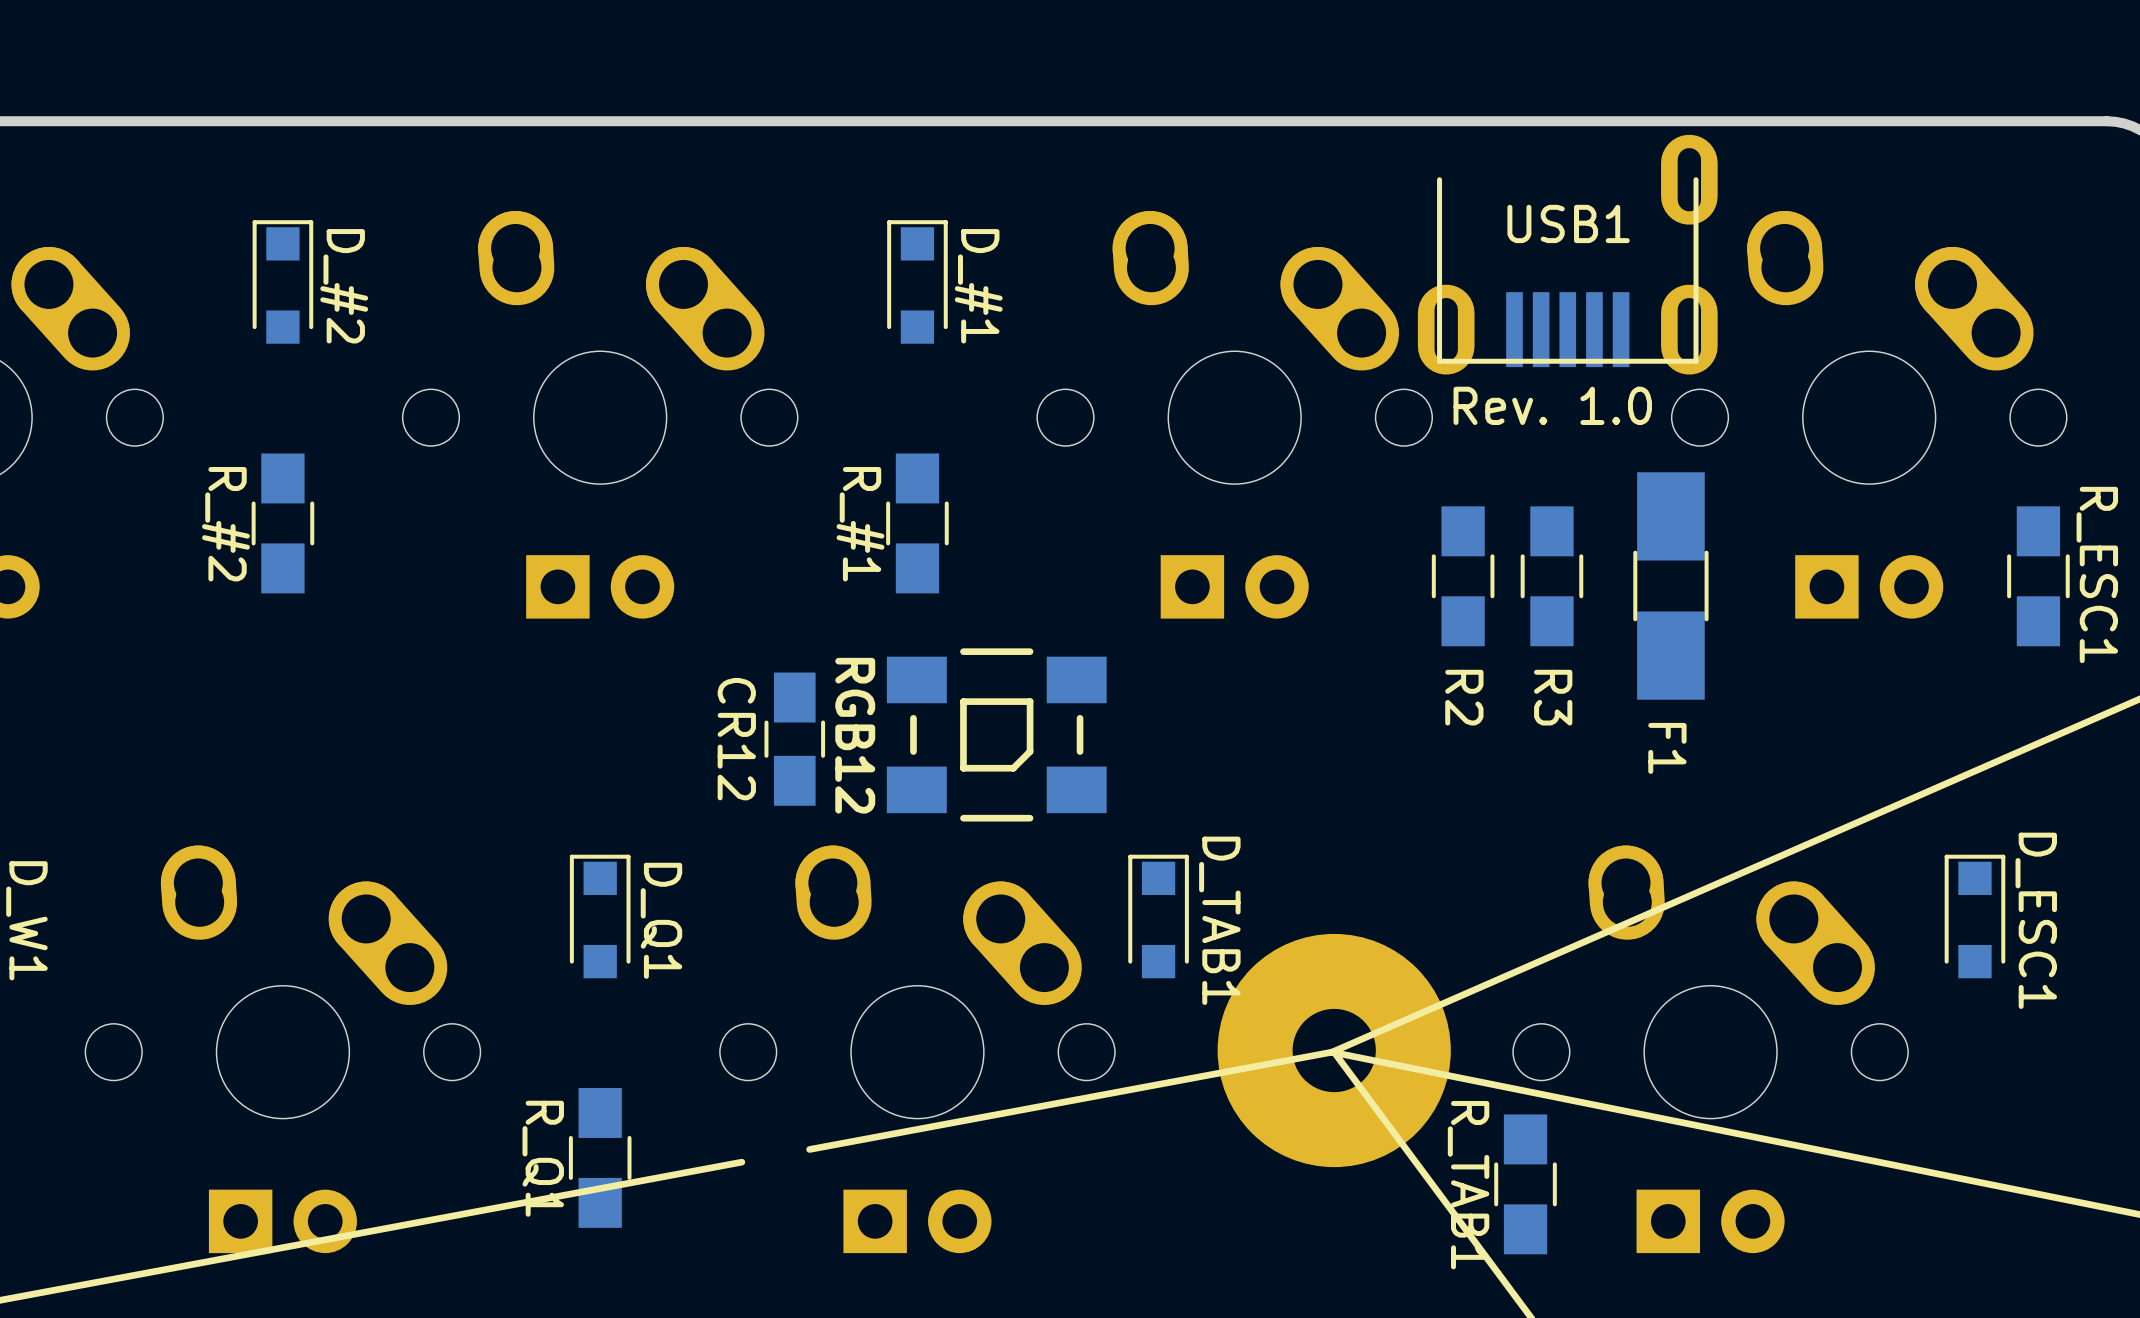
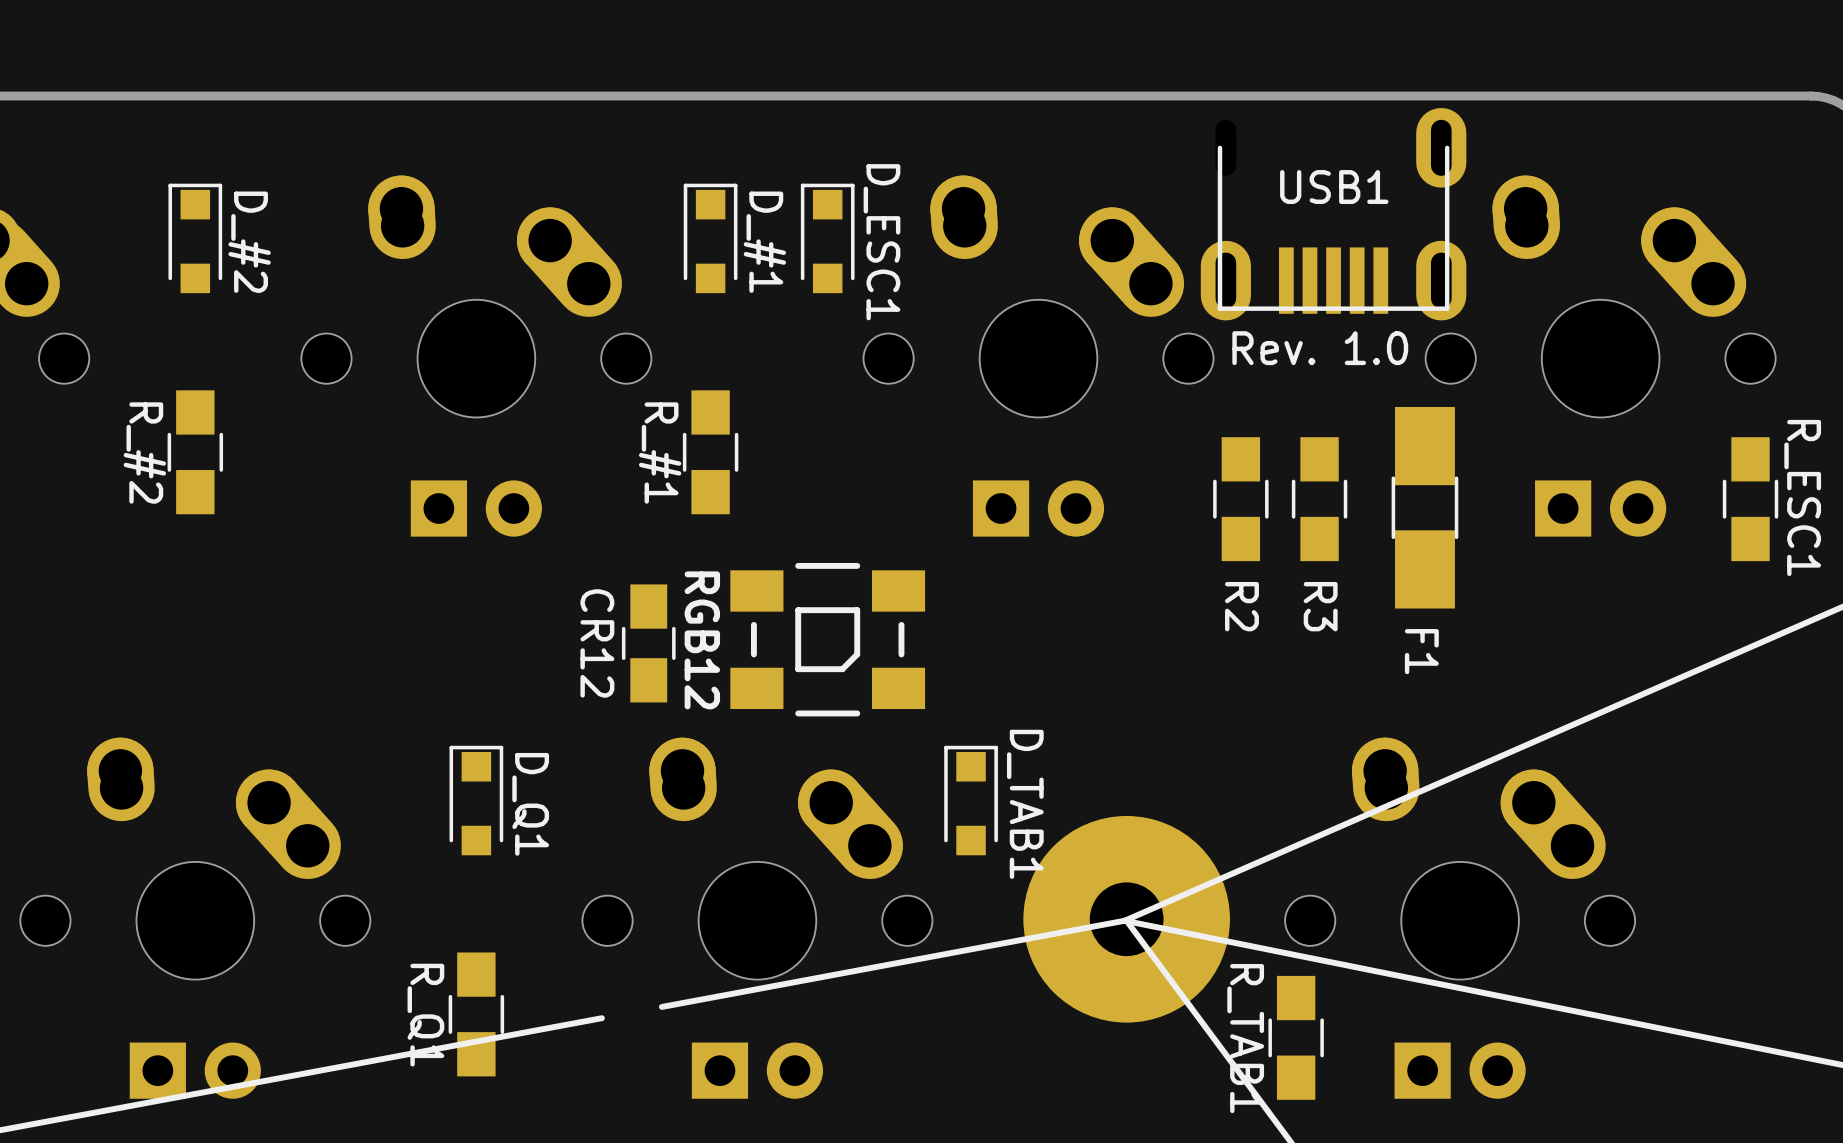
D_#1 position: (917, 281) -> (710, 238)
R_#1 position: (917, 523) -> (710, 452)
D_ESC1 position: (1974, 916) -> (827, 238)

